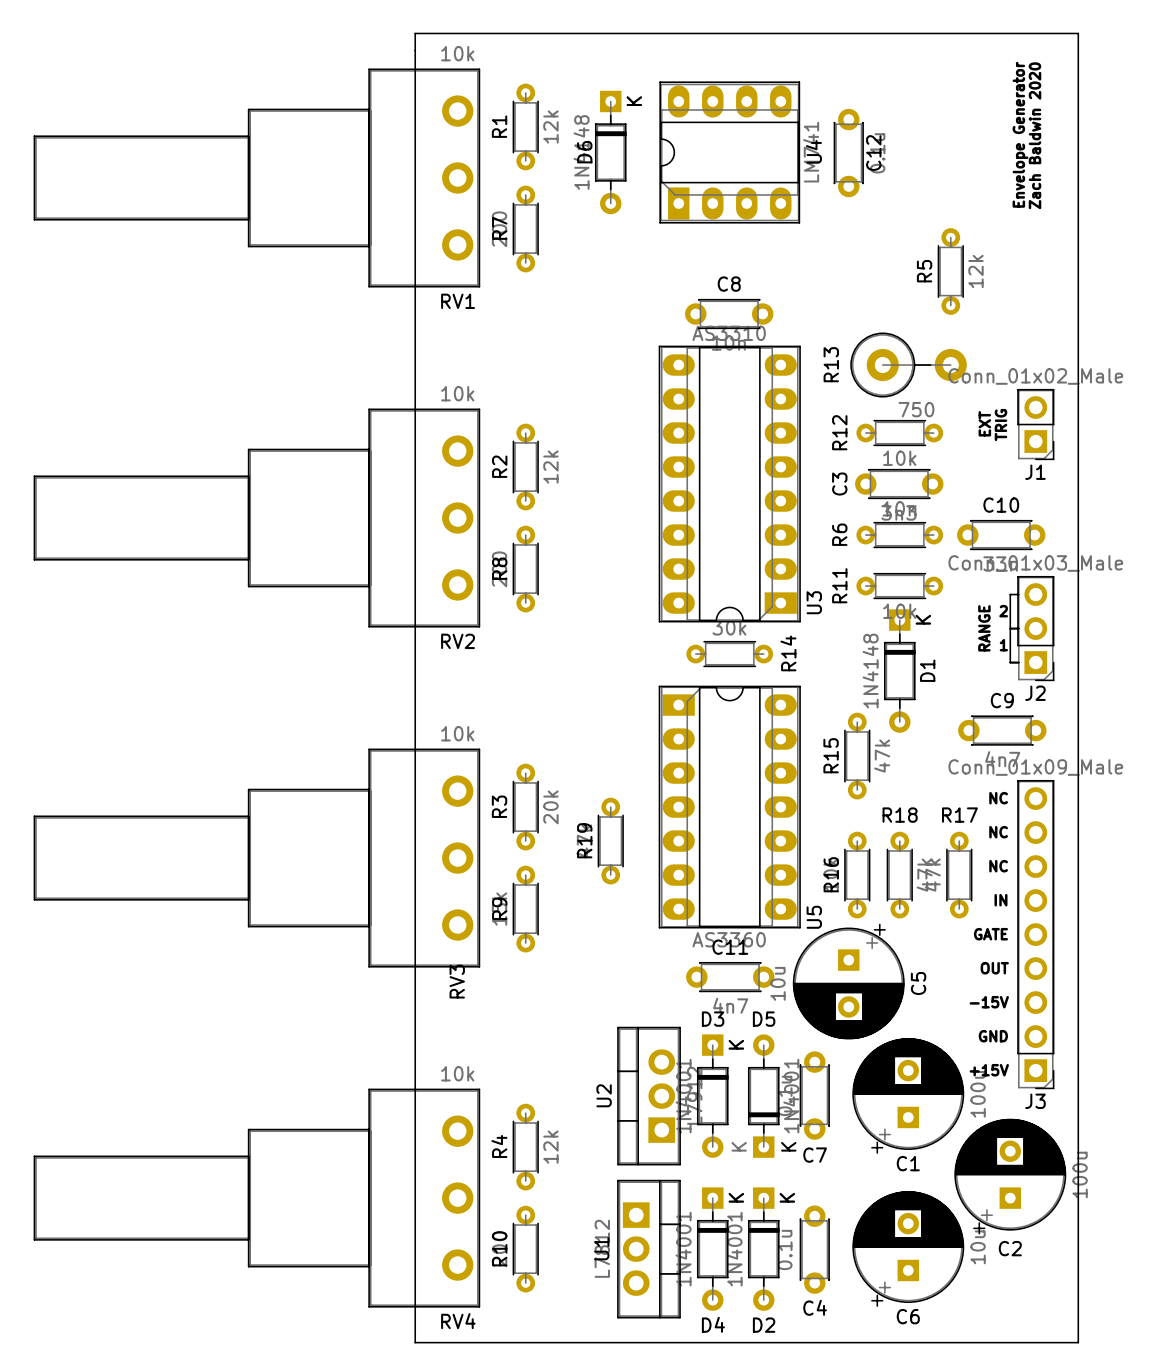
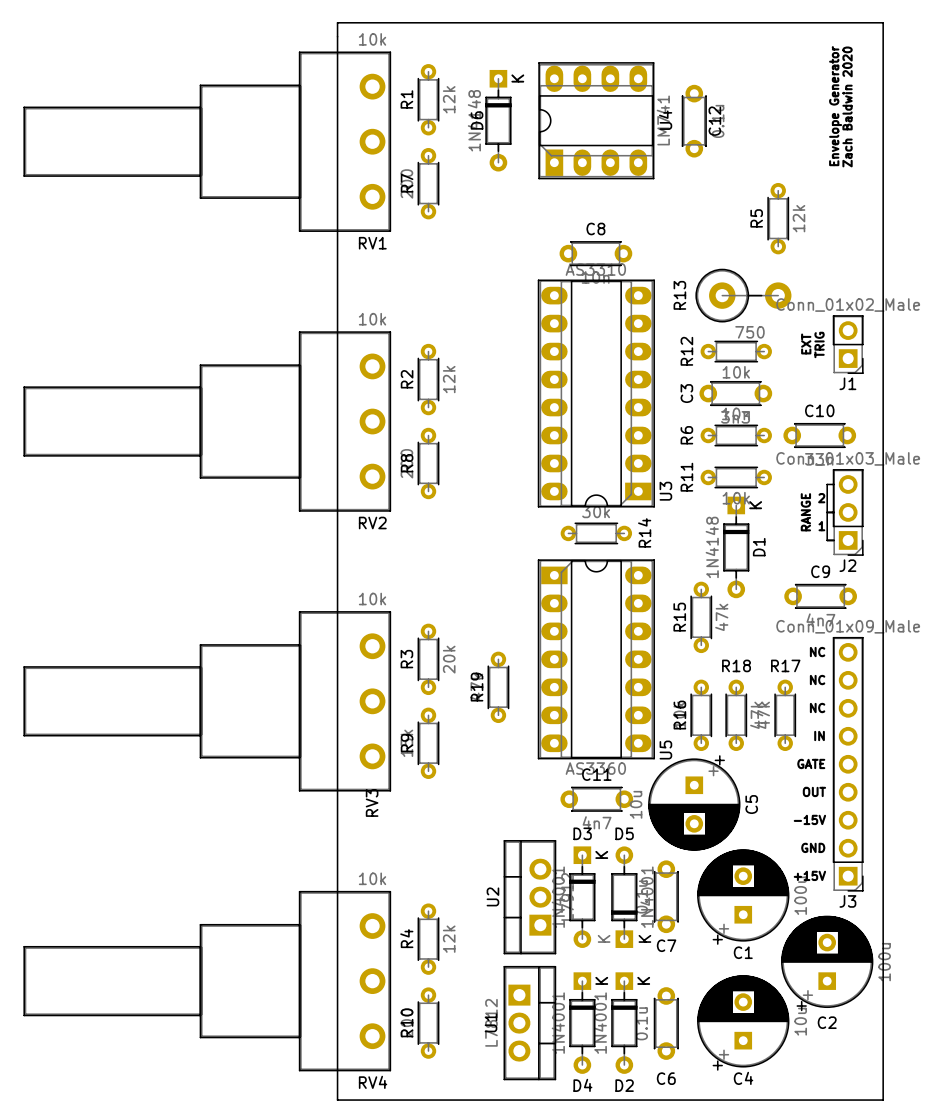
C4 name position: C4 (815, 1307) -> C4 (743, 1078)
C6 name position: C6 (908, 1316) -> C6 (666, 1078)

